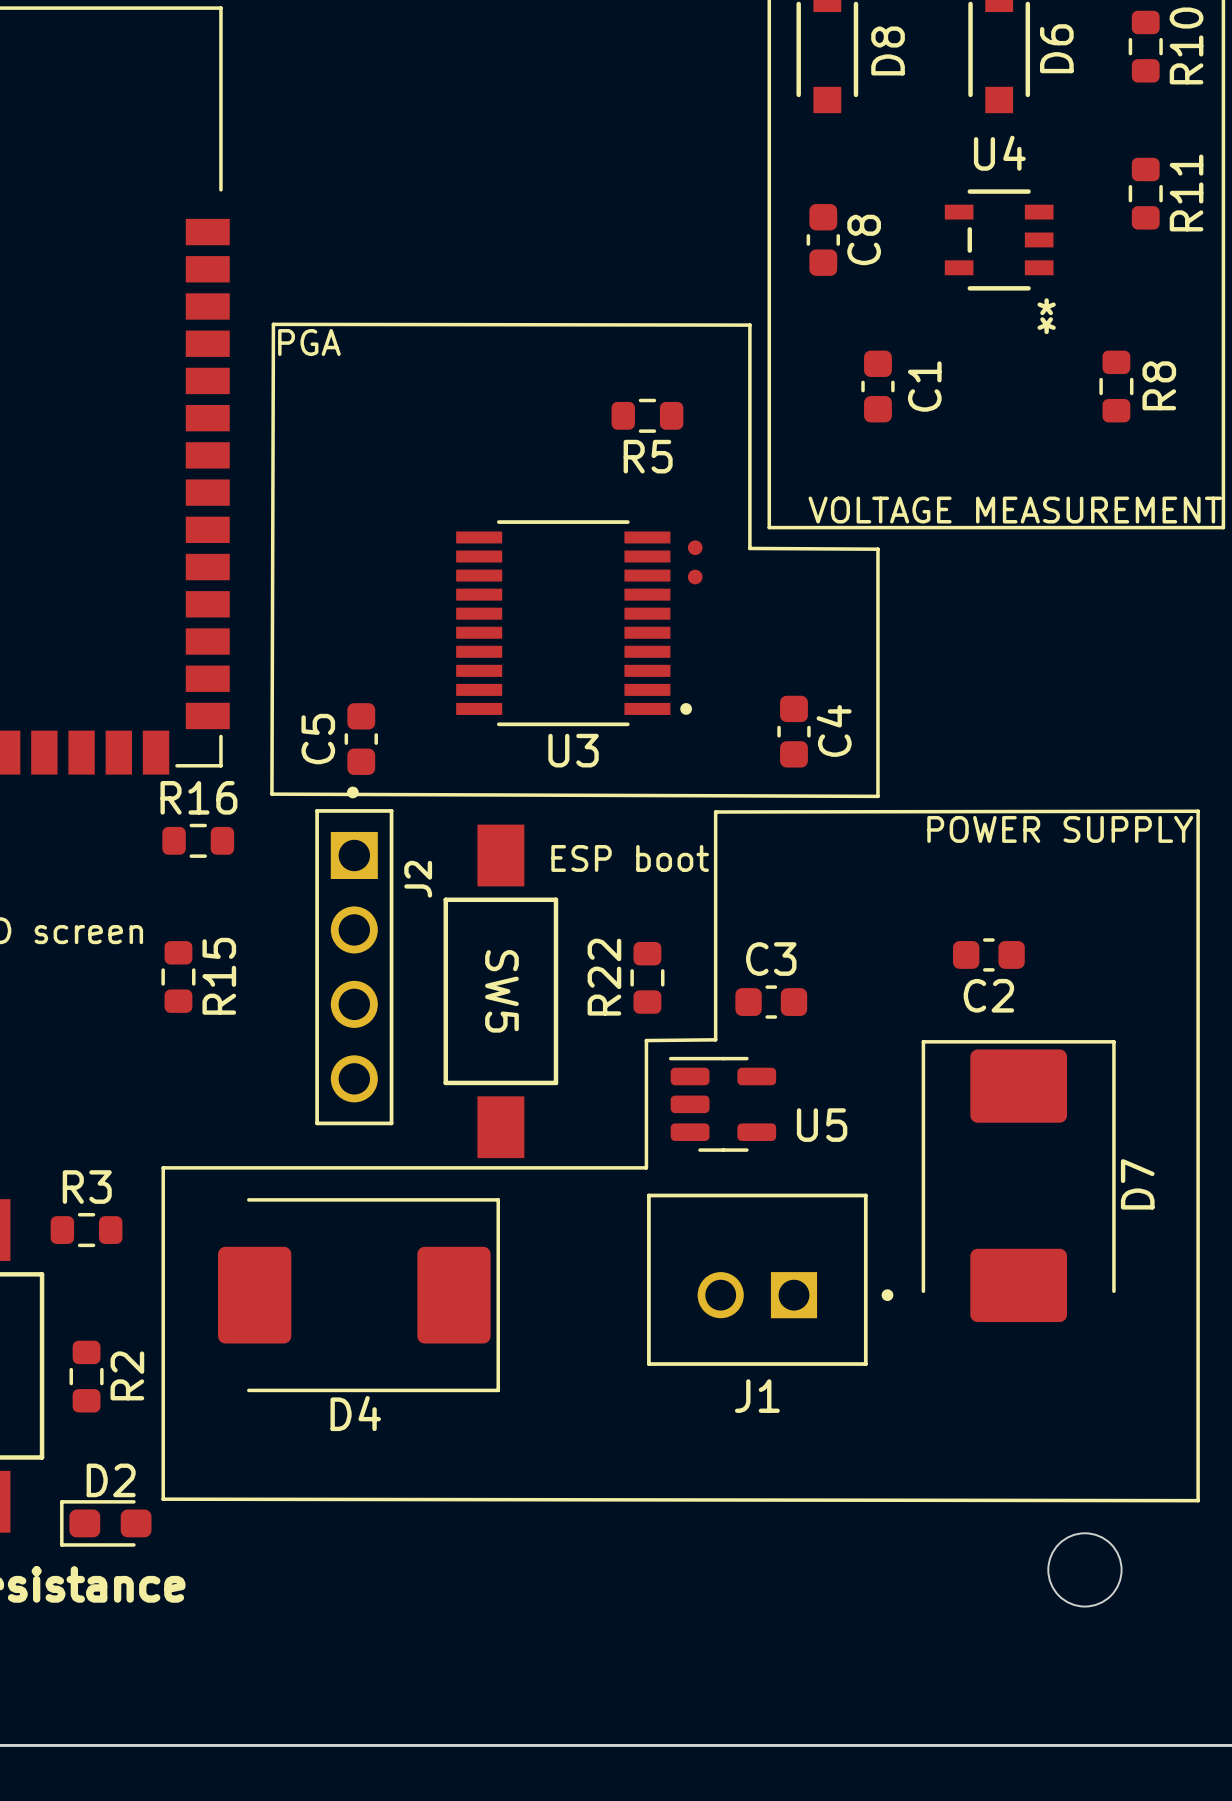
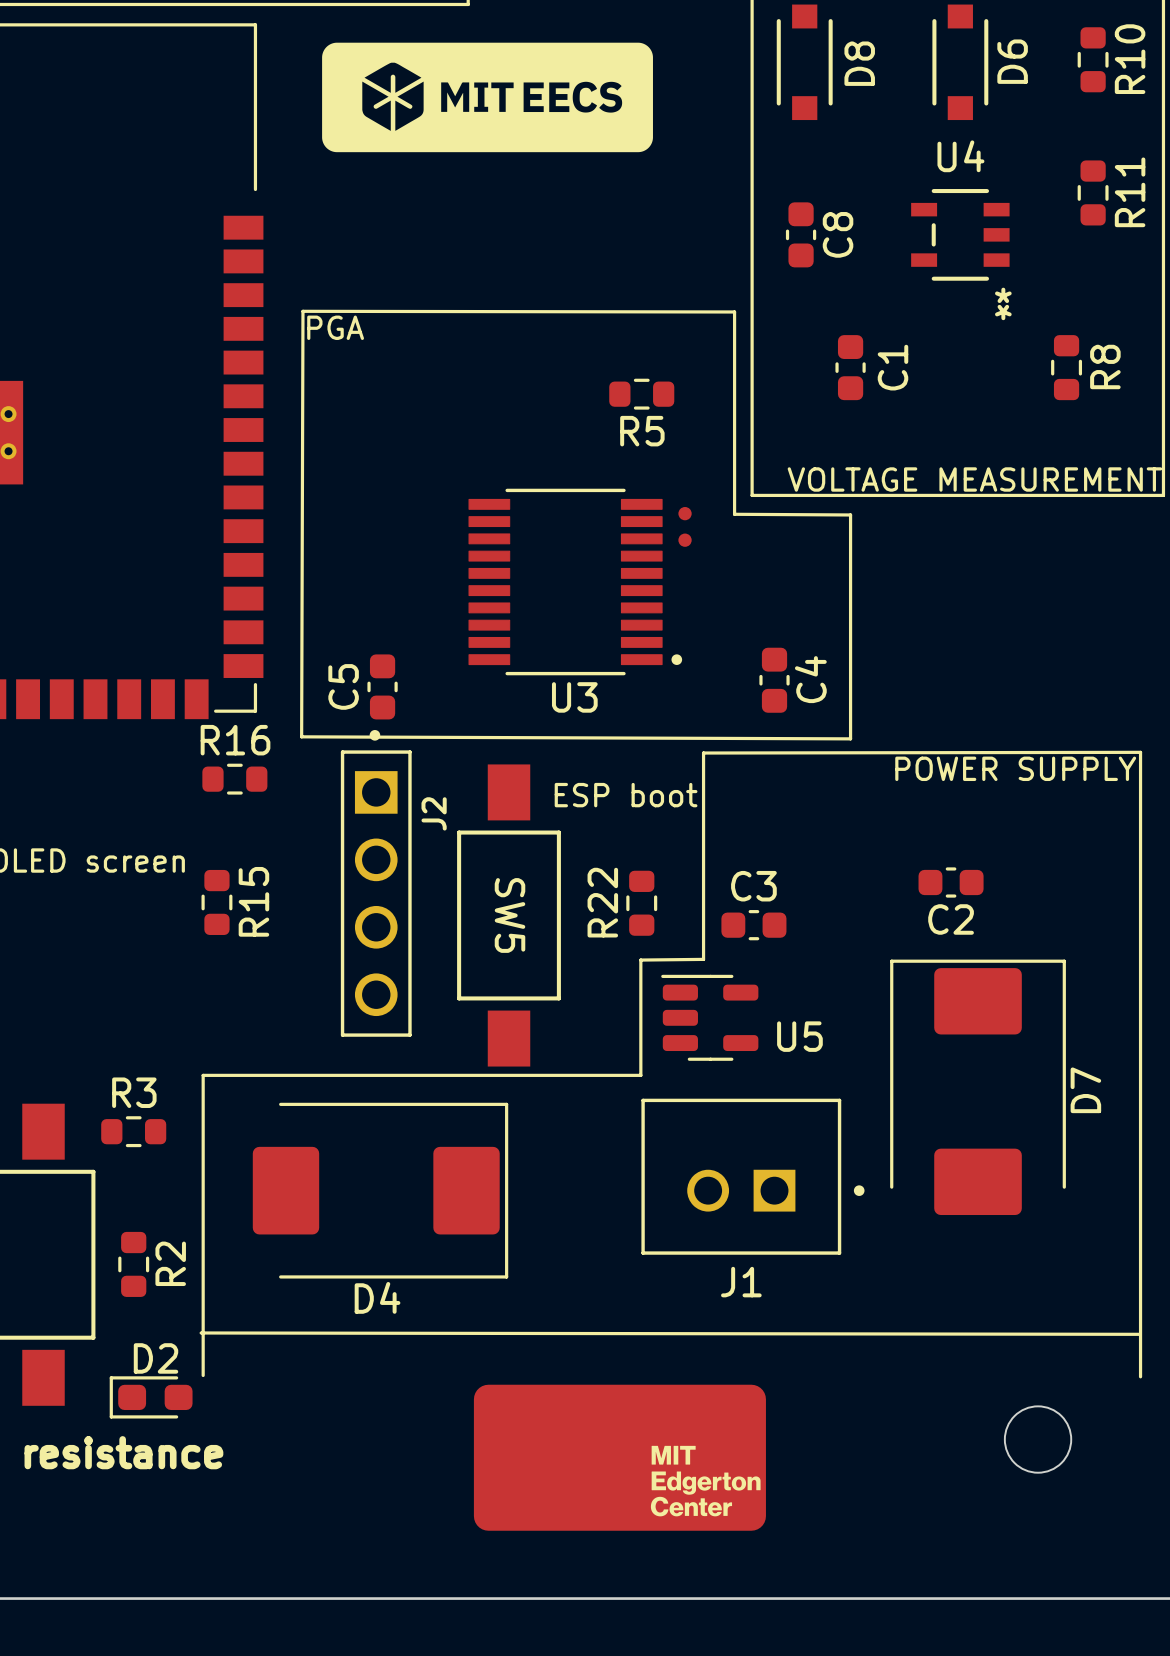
drawing: none -> [322, 42, 653, 153]
line: (163, 1499) (1198, 1500) -> (201, 1332) (1138, 1334)
part: none -> (619, 1457)

